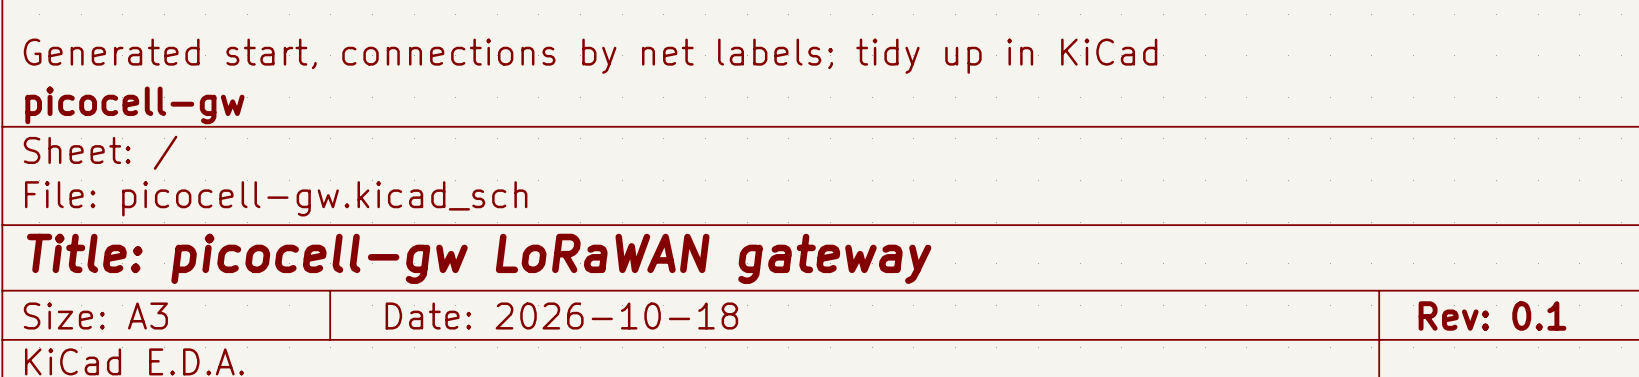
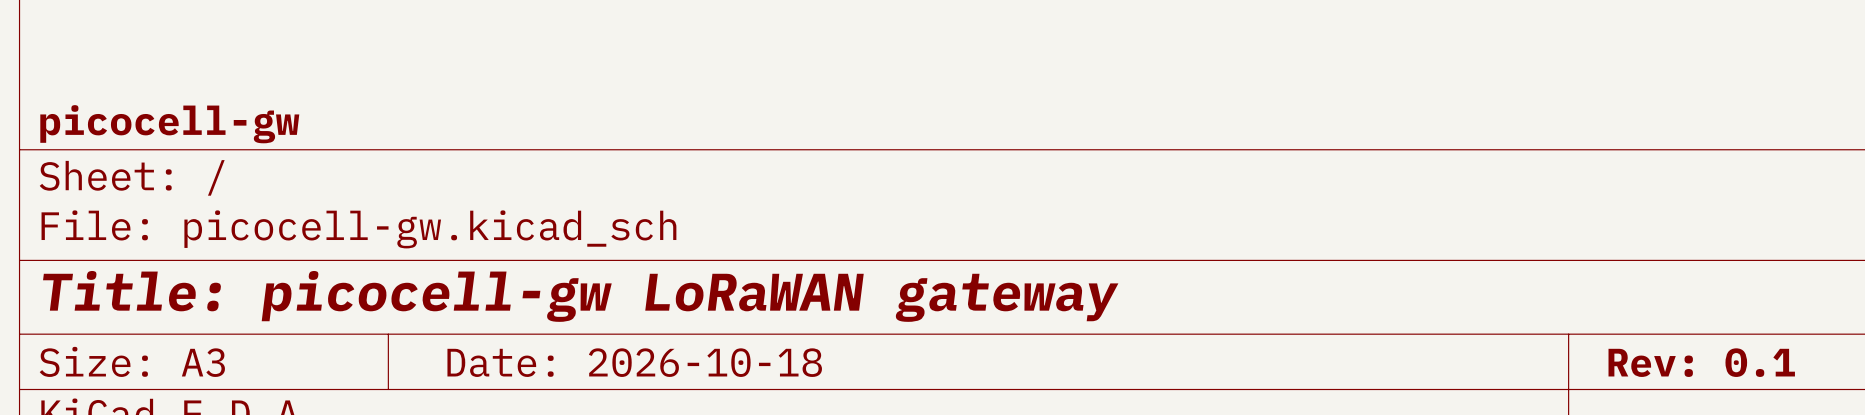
title block: Generated start, connections by net labels; tidy up in KiCad (590, 56) -> none

